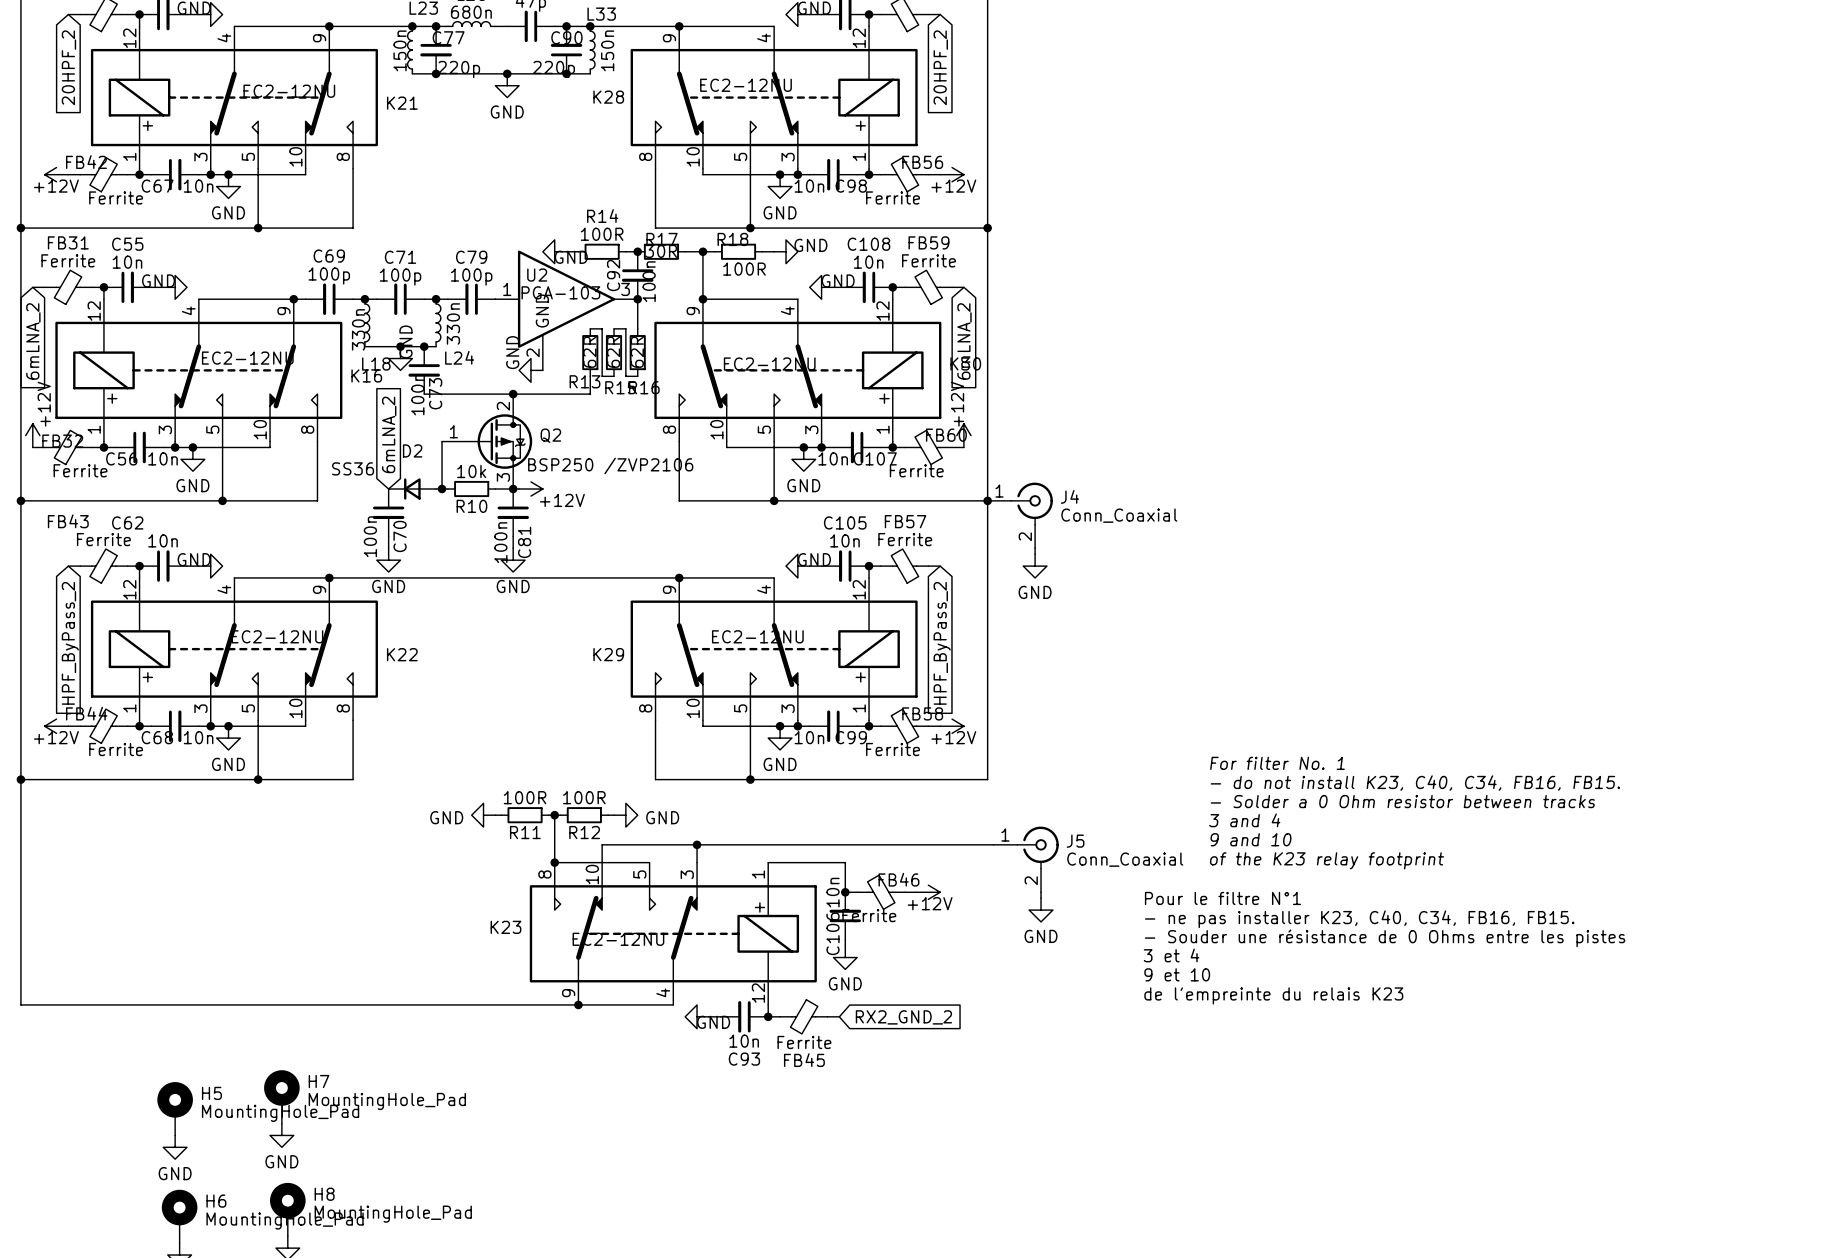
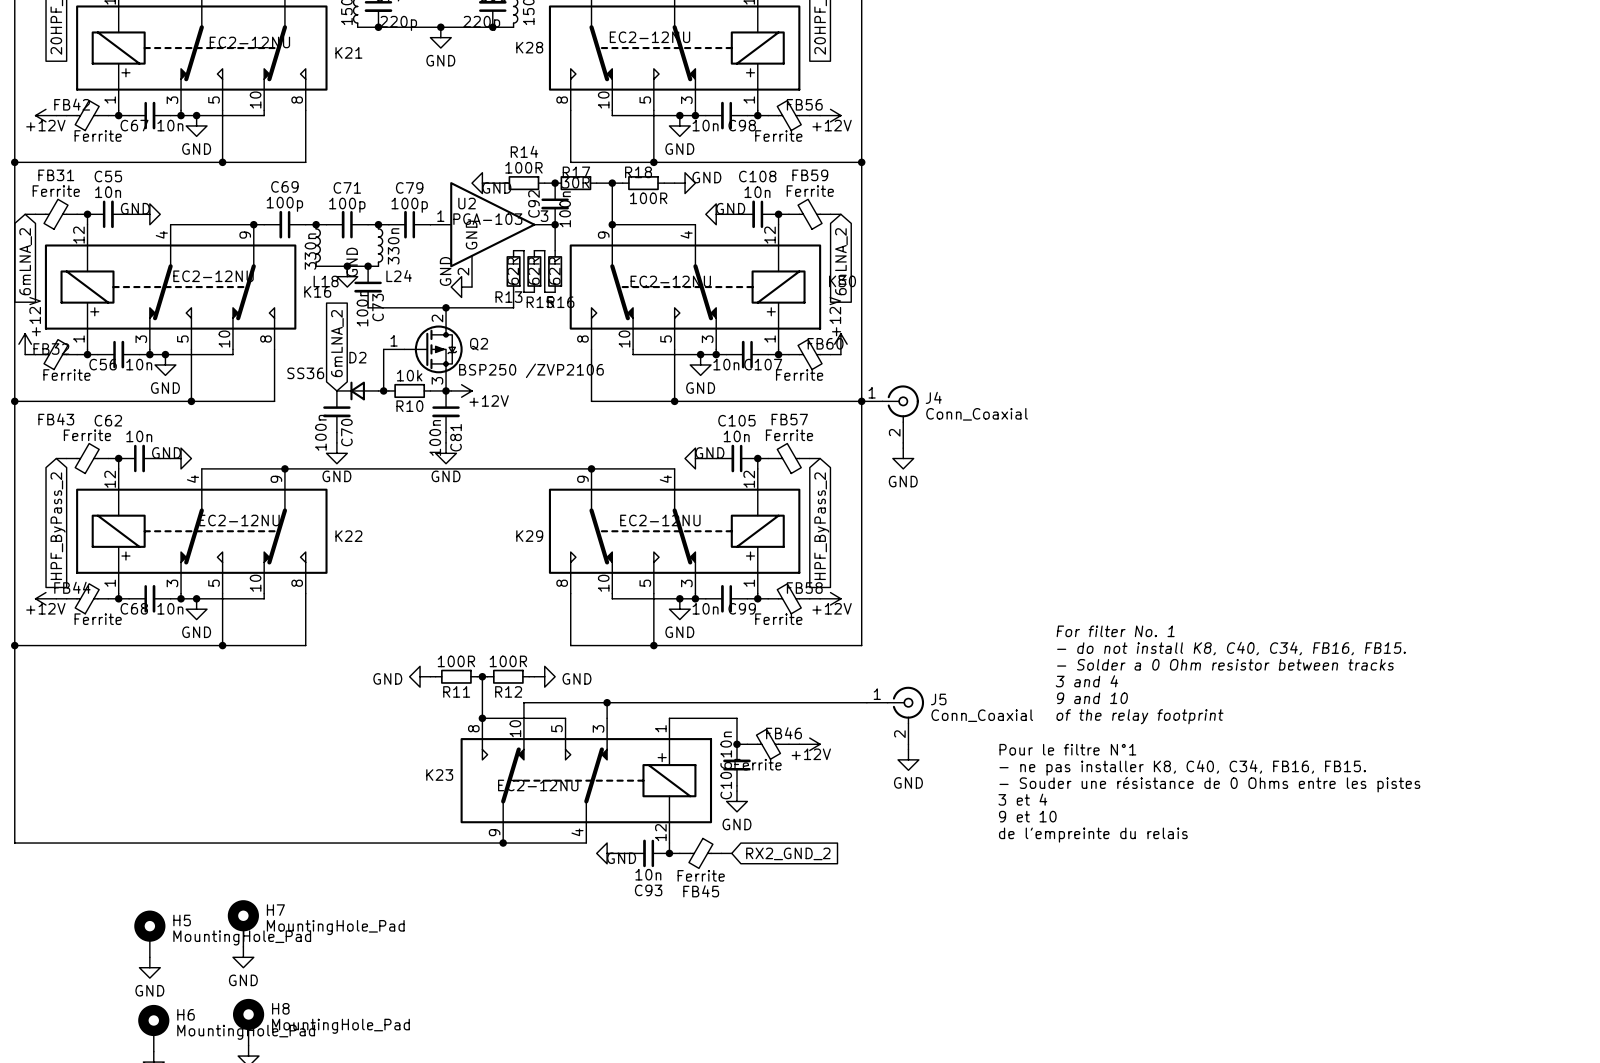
text: - do not install K23, C40, C34, FB16, FB15. (1415, 783) -> - do not install K8, C40, C34, FB16, FB15. (1231, 648)
text: of the K23 relay footprint (1326, 860) -> of the relay footprint (1139, 716)
text: - ne pas installer K23, C40, C34, FB16, FB15. (1359, 919) -> - ne pas installer K8, C40, C34, FB16, FB15. (1182, 767)
text: de l'empreinte du relais K23 (1273, 995) -> de l'empreinte du relais (1093, 835)

